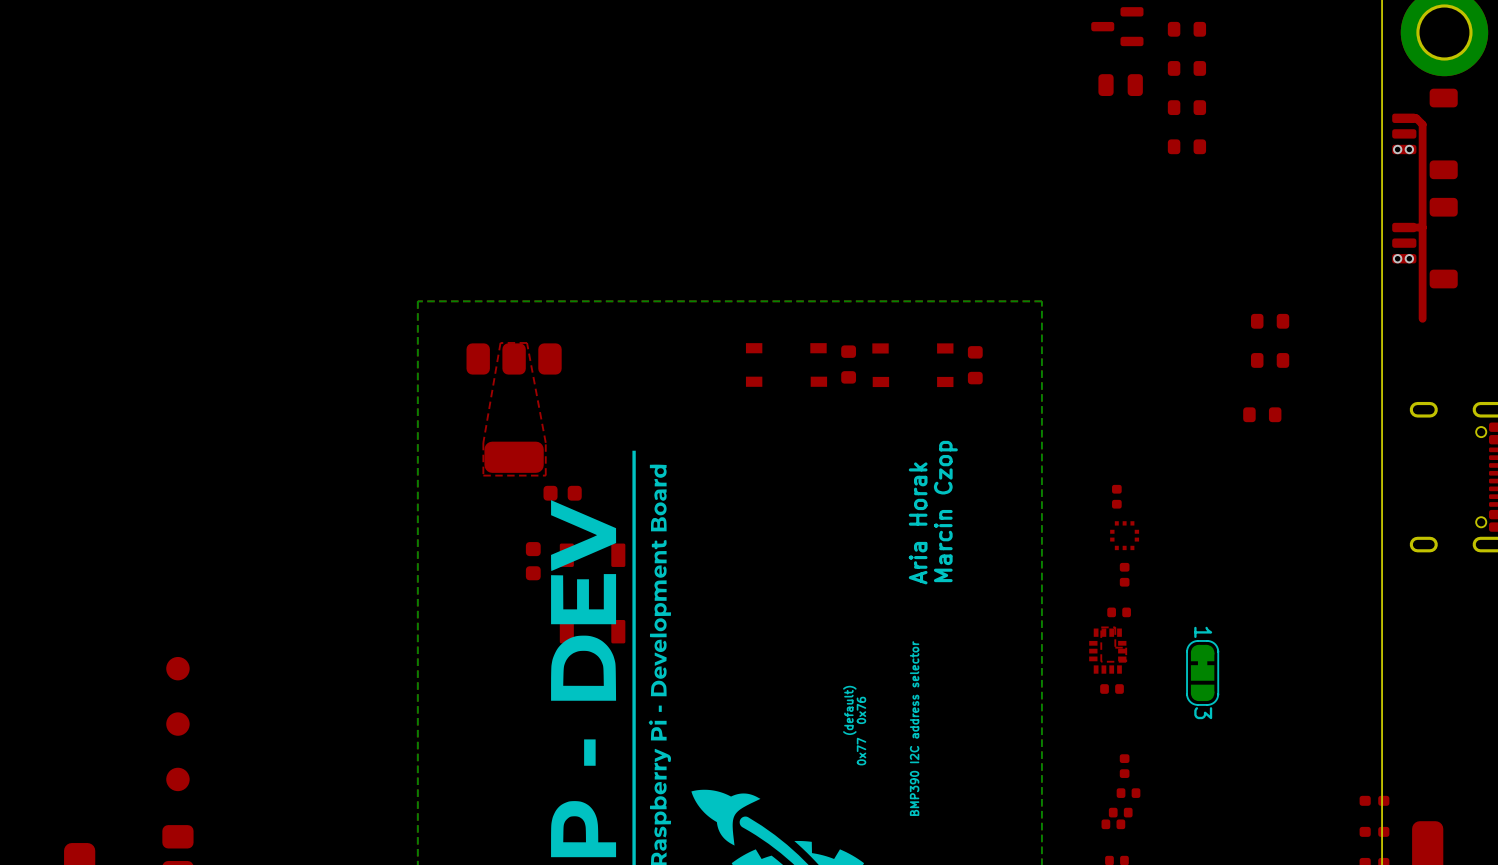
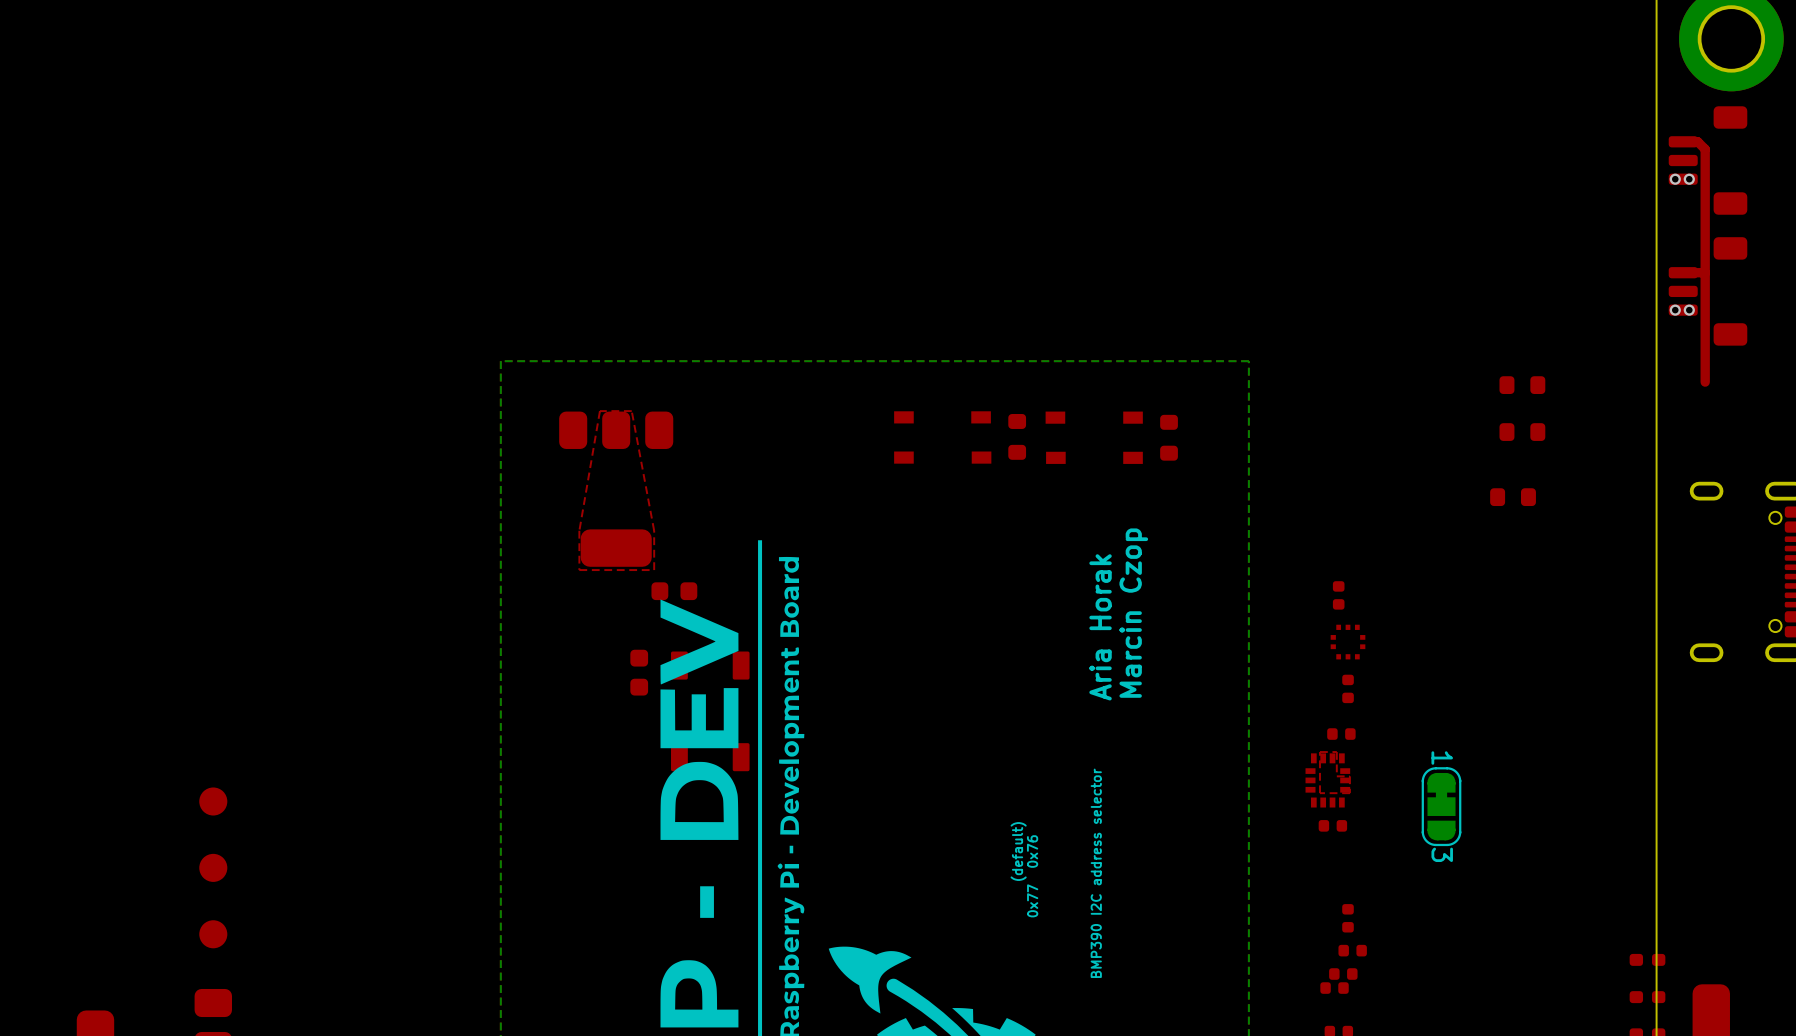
part: (1117, 26) -> none
part: (1186, 29) -> none
part: (1186, 68) -> none
part: (1120, 85) -> none
part: (1186, 107) -> none
part: (1186, 146) -> none

